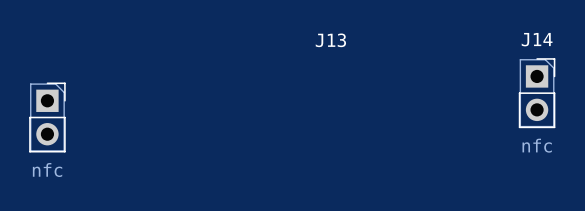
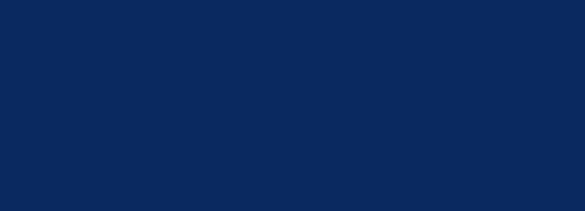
J14: nfc (537, 93) -> none
J13: nfc (47, 117) -> none

